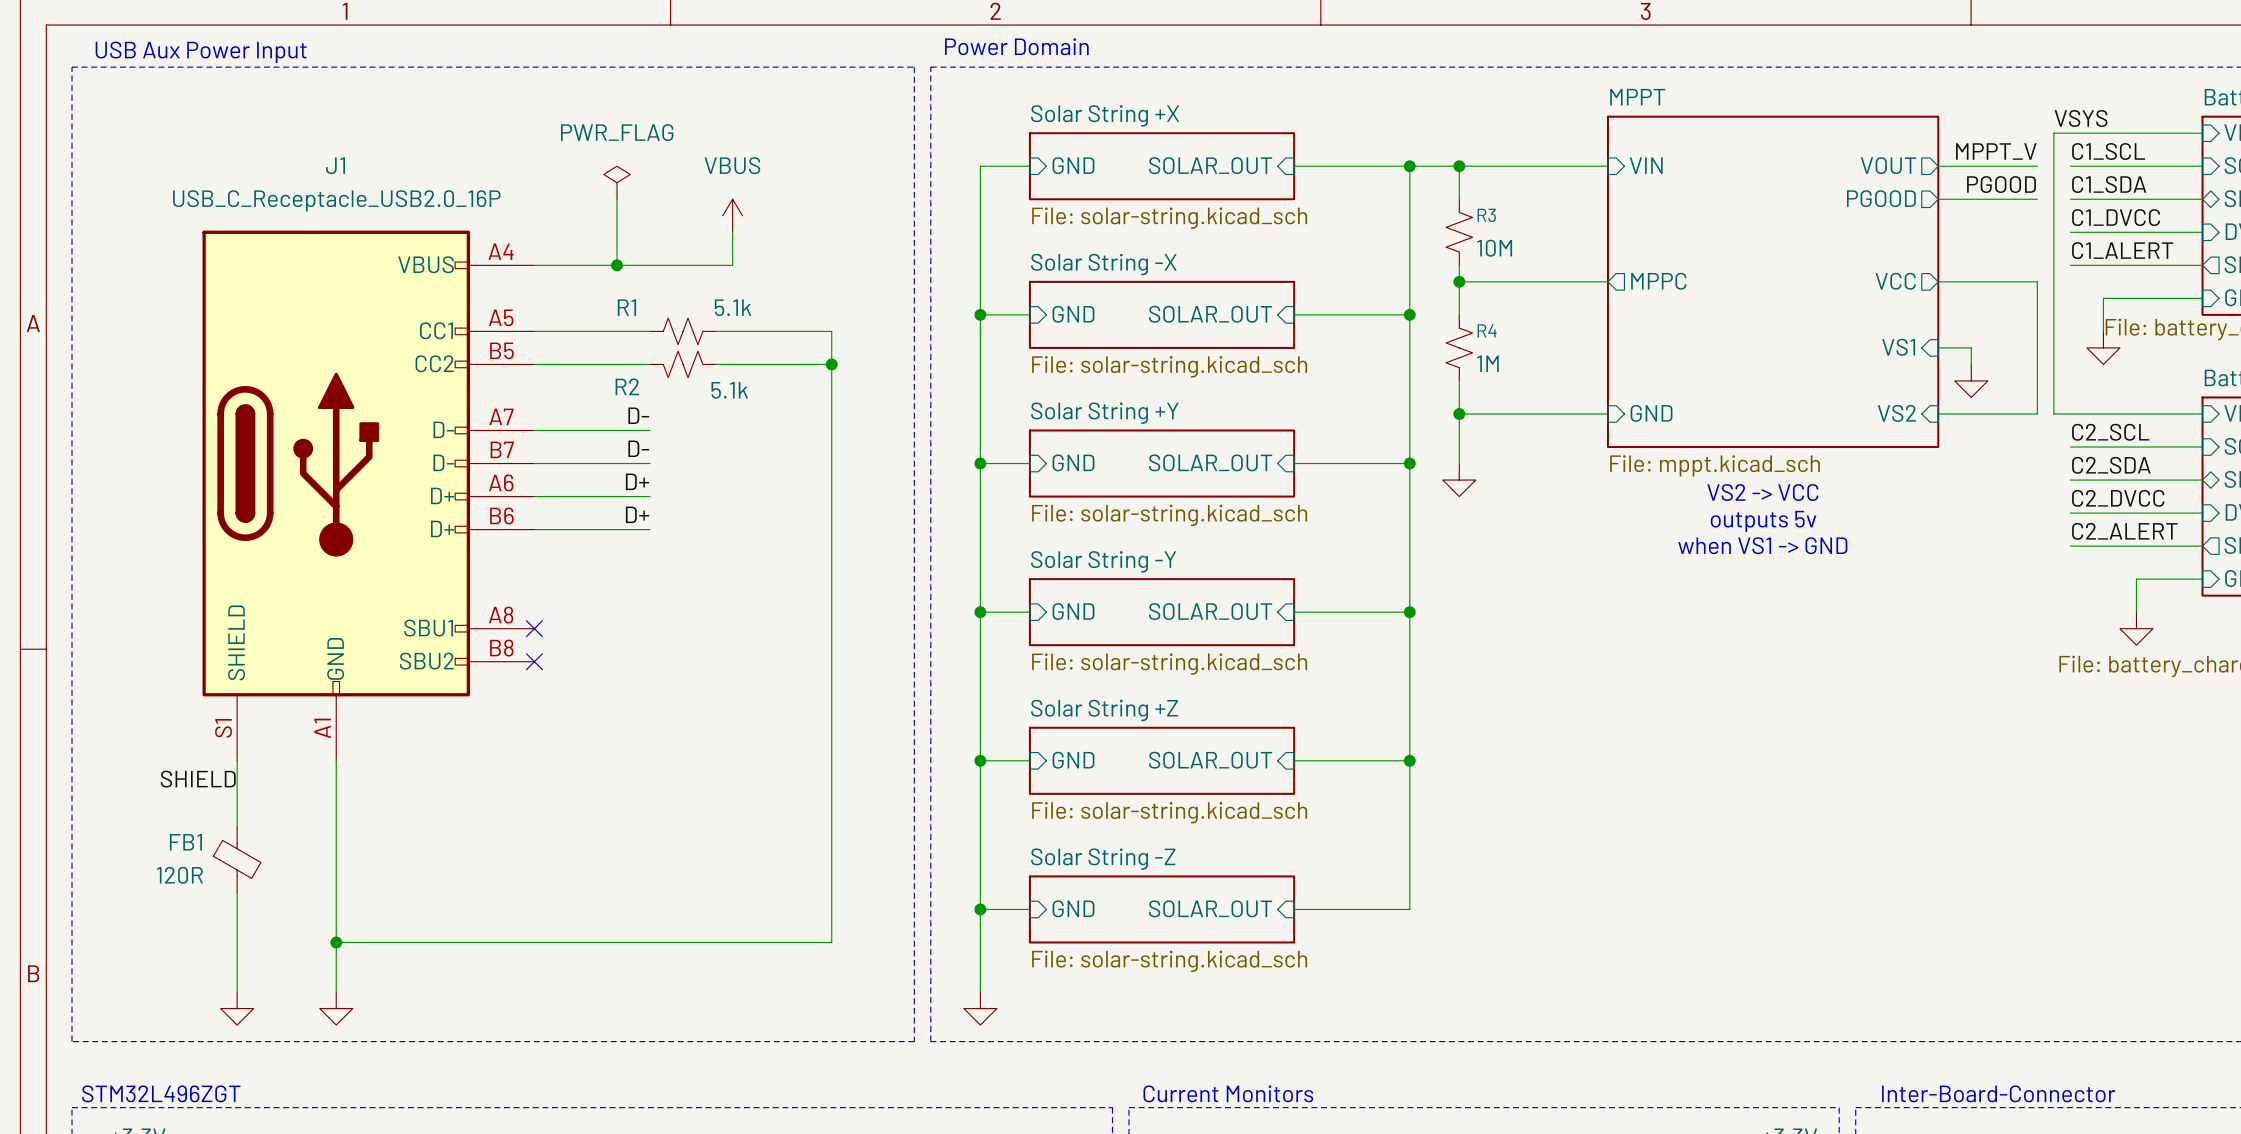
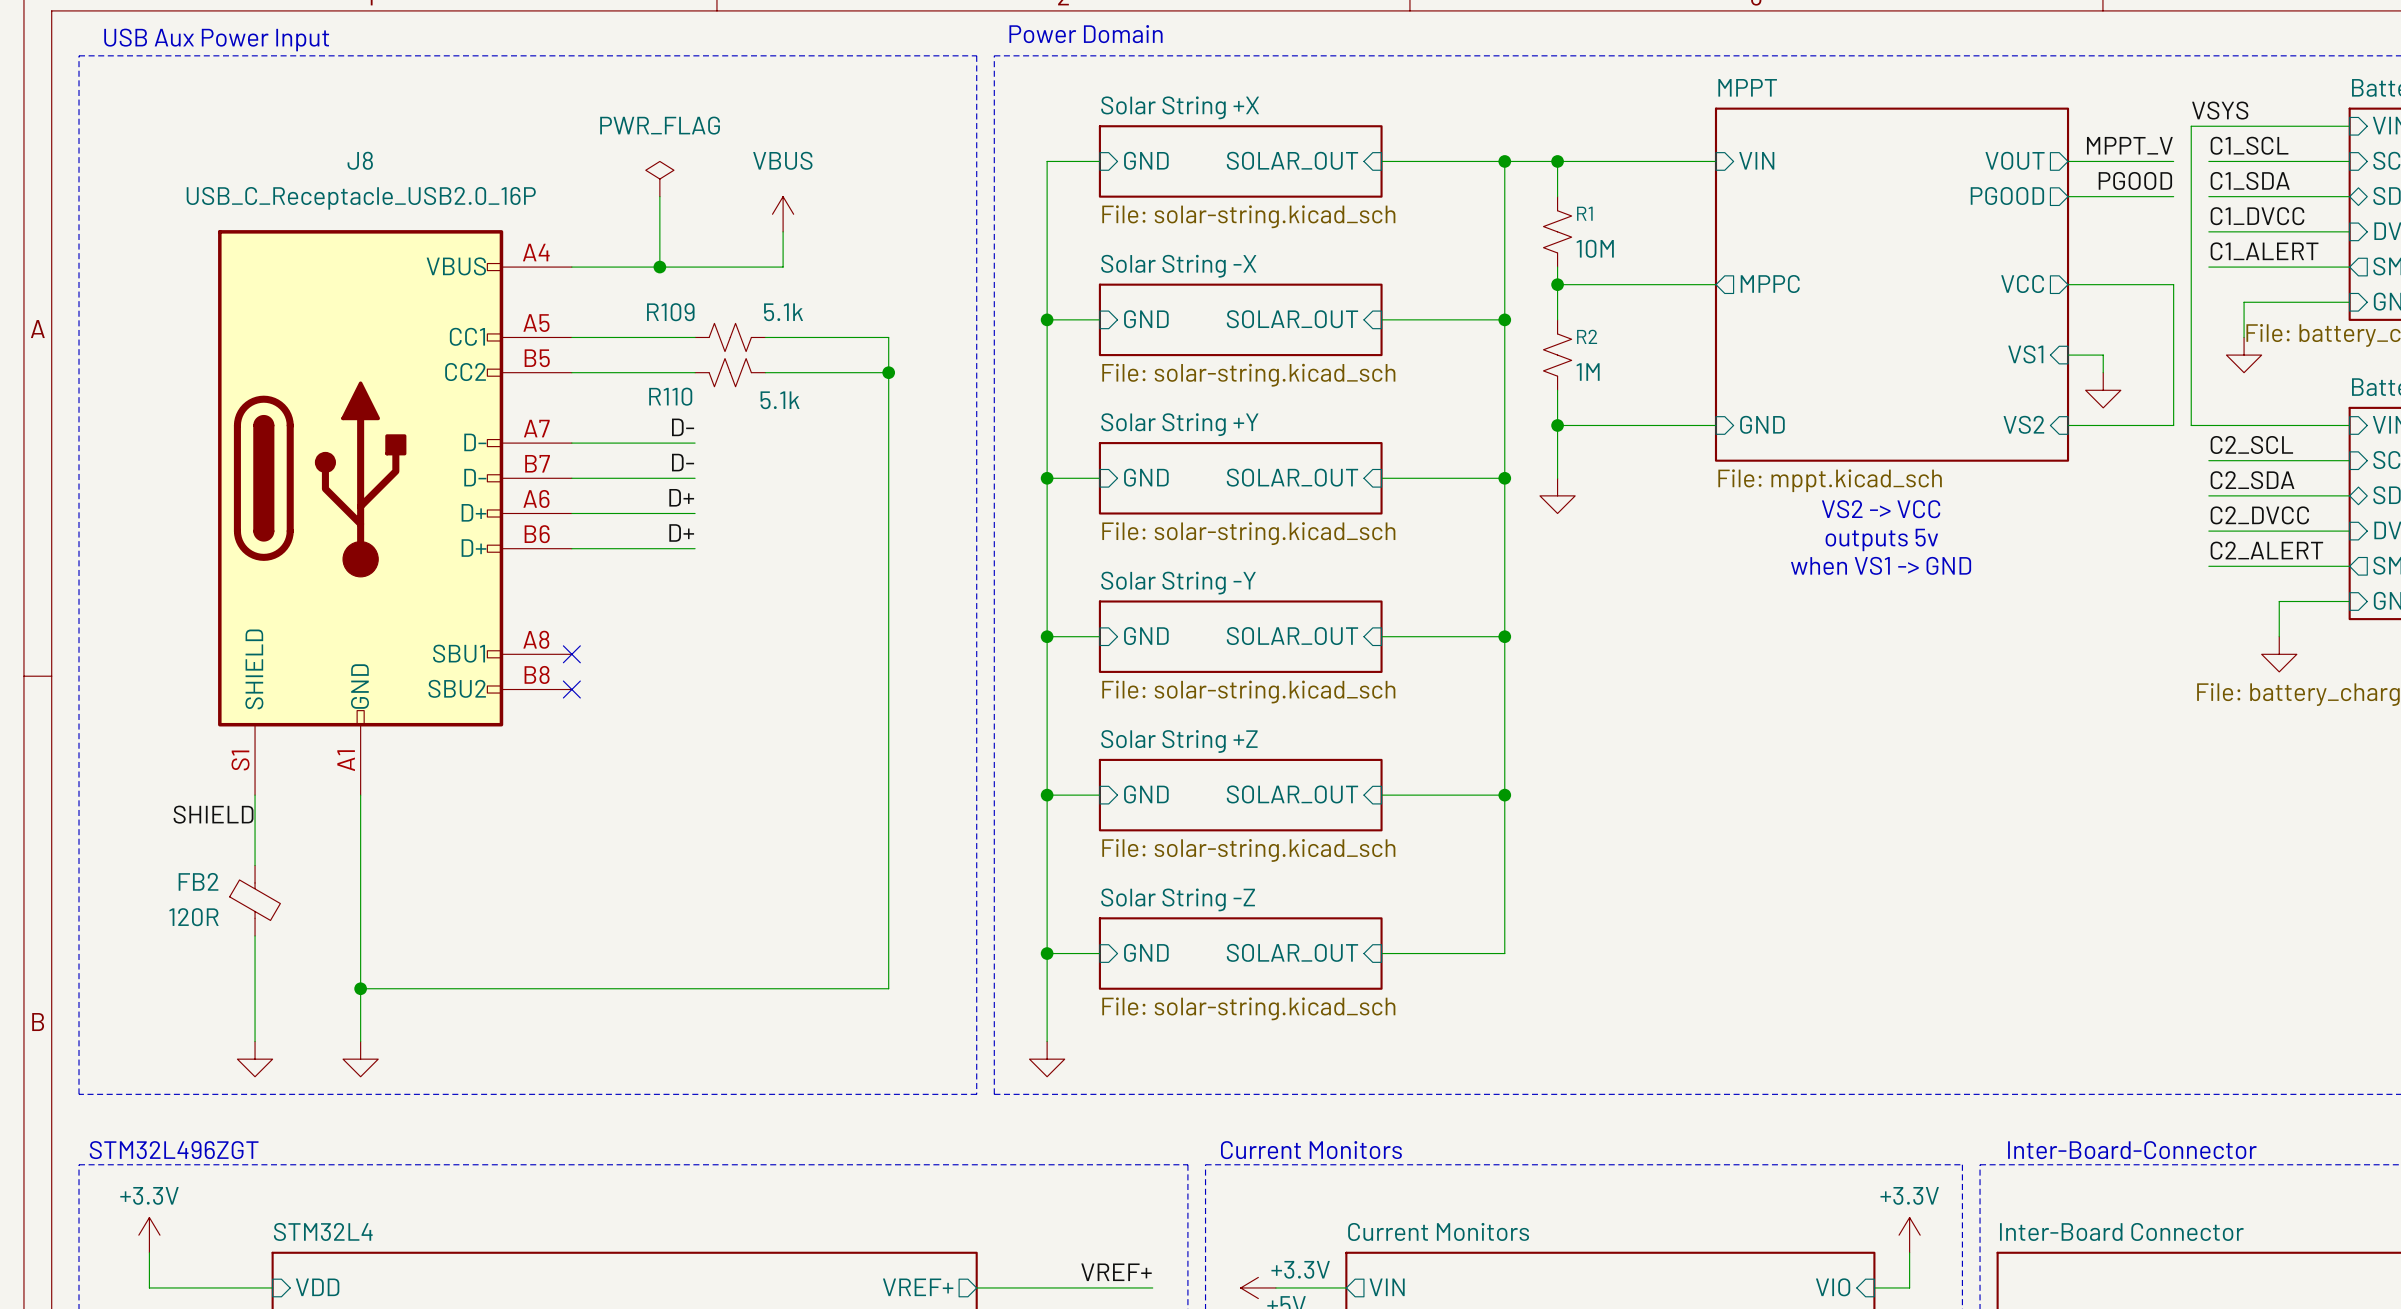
J1 name: J1 (335, 165) -> J8 (360, 160)
R3 name: R3 (1486, 215) -> R1 (1584, 213)
R1 name: R1 (626, 307) -> R109 (670, 312)
R4 name: R4 (1487, 330) -> R2 (1587, 336)
R2 name: R2 (627, 386) -> R110 (670, 396)
FB1 name: FB1 (185, 842) -> FB2 (198, 881)

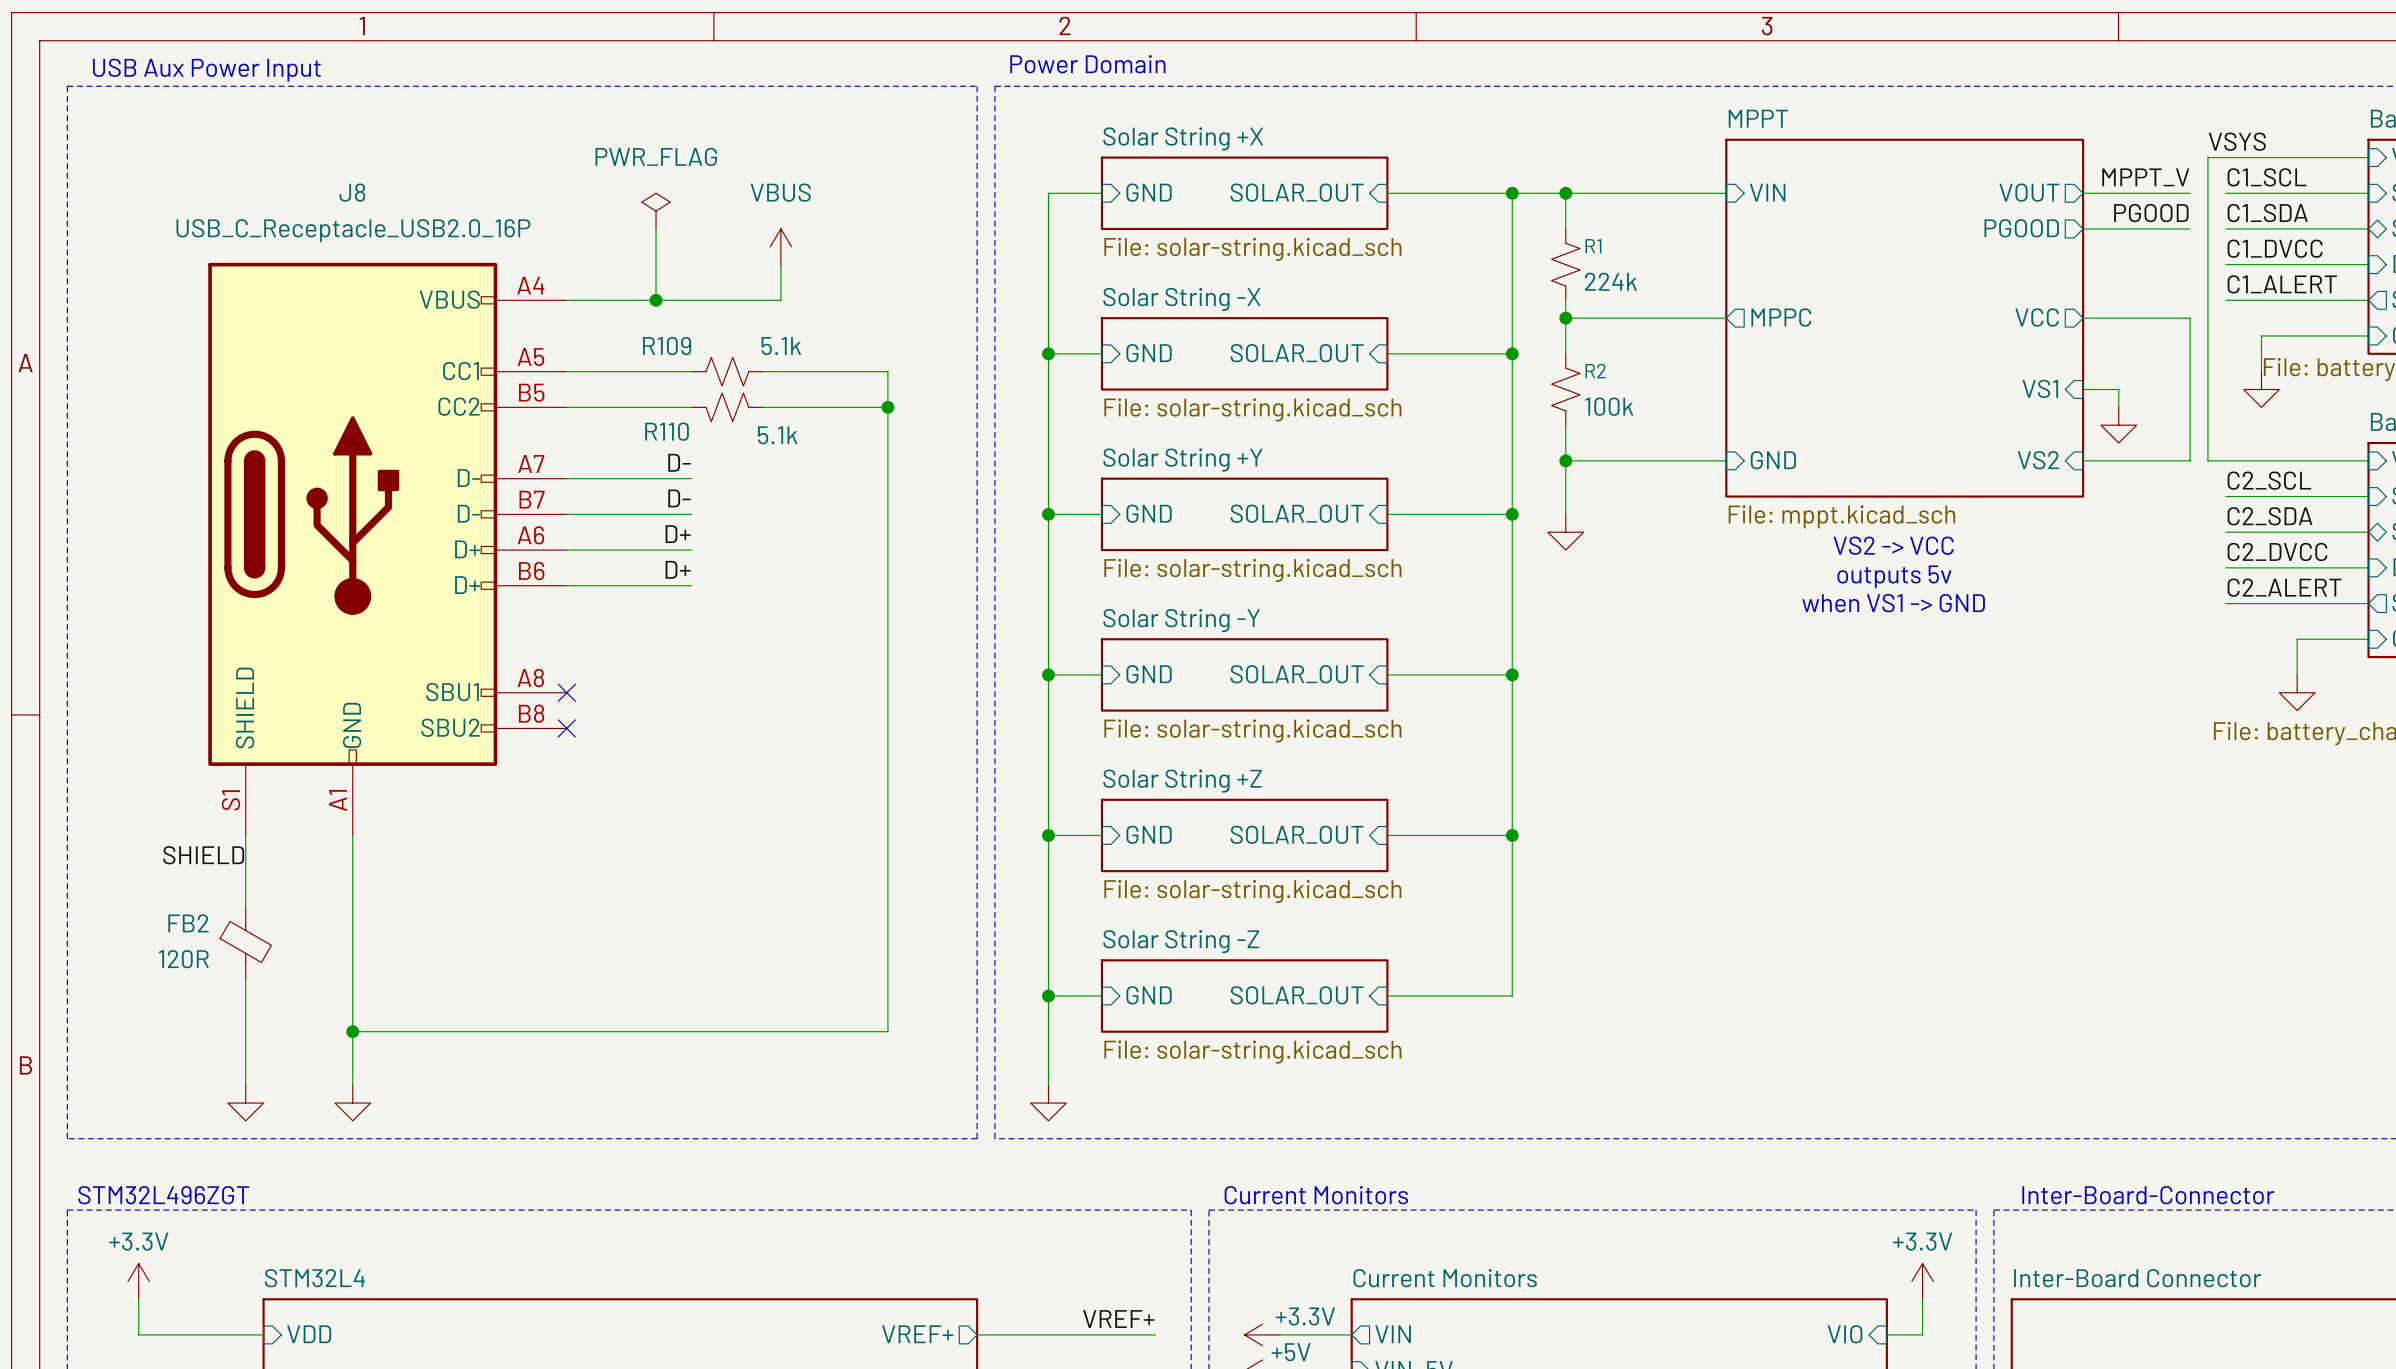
R1 value: 10M (1595, 248) -> 224k (1611, 281)
R2 value: 1M (1588, 372) -> 100k (1609, 406)

